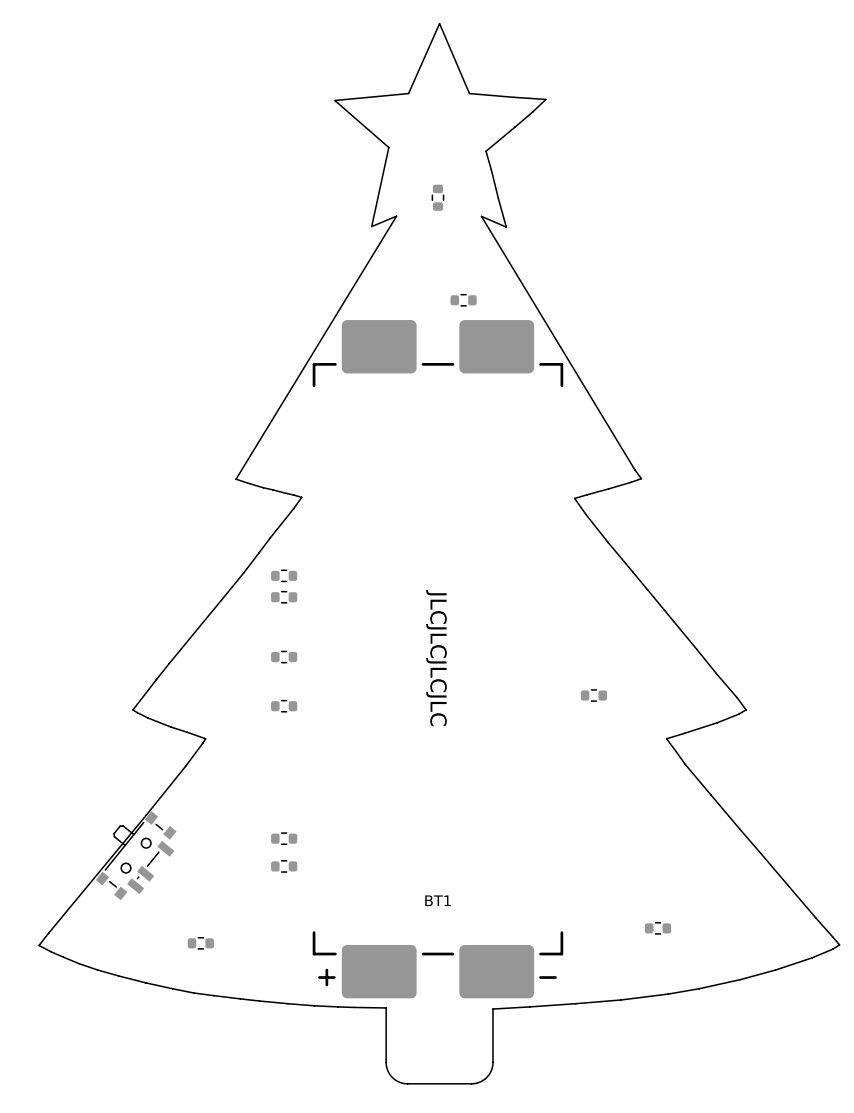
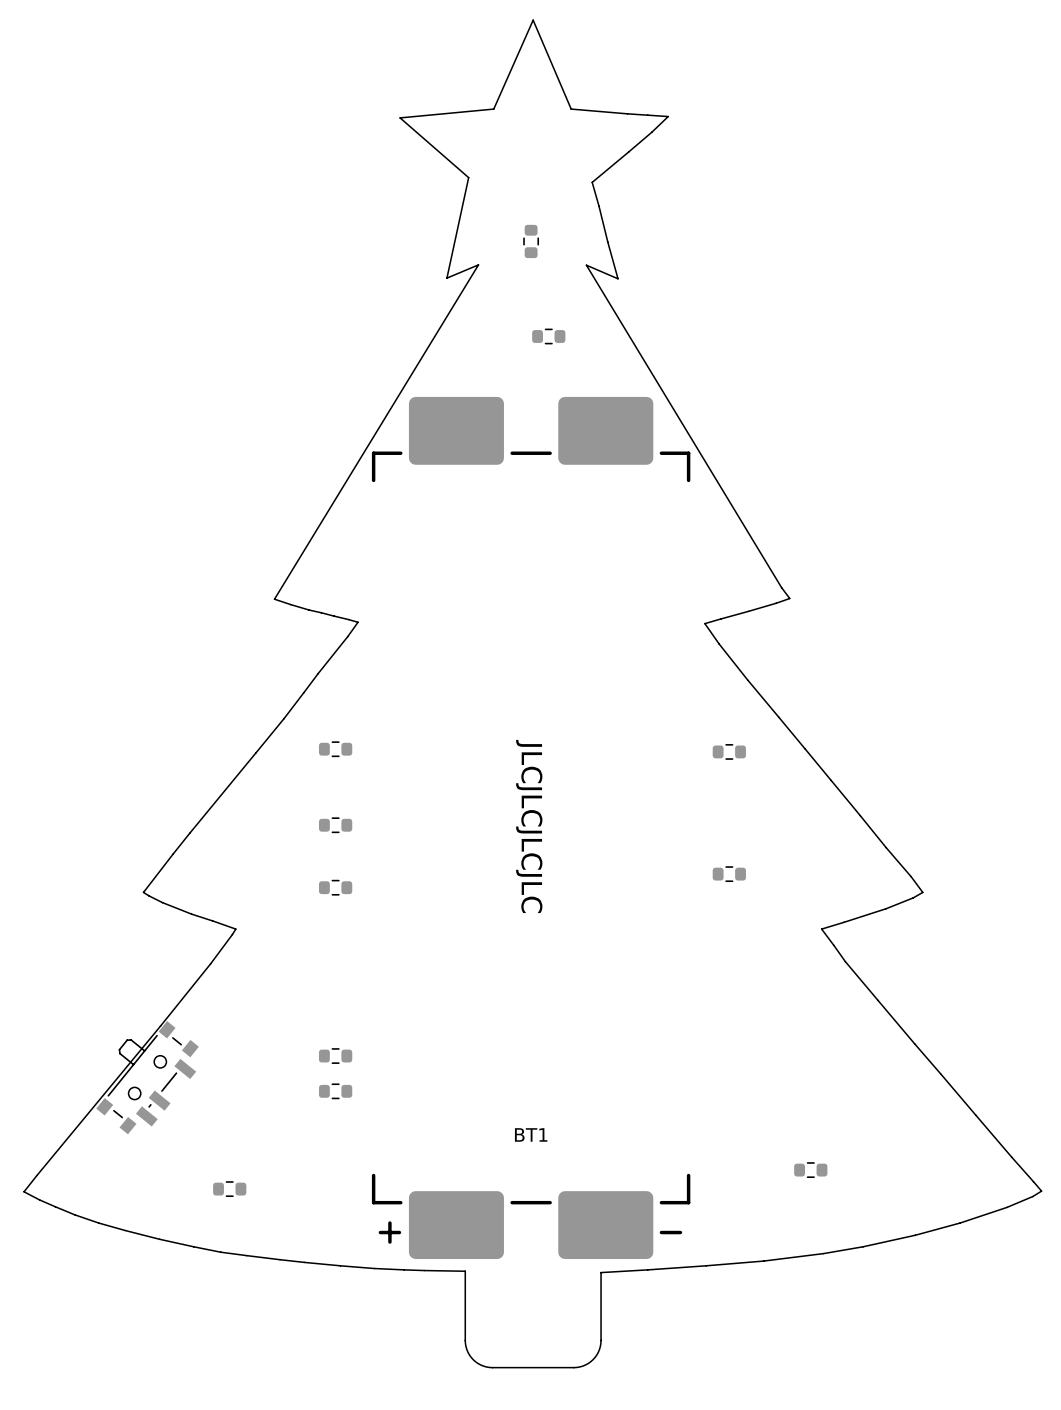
part position: (463, 300) -> (548, 336)
part: (284, 575) -> none
part: none -> (729, 751)

